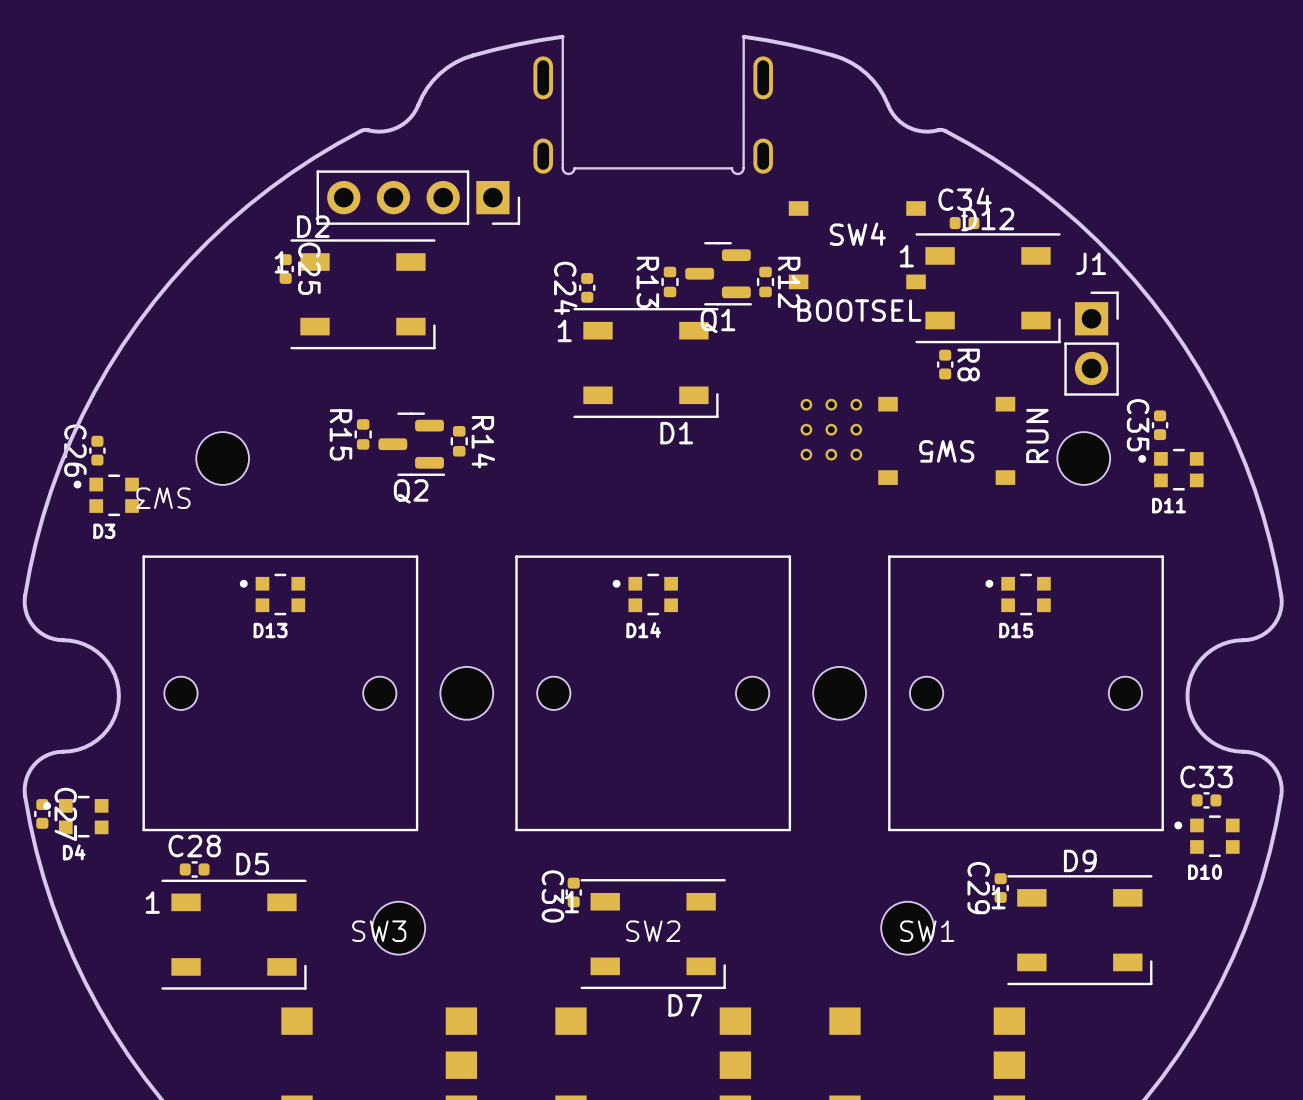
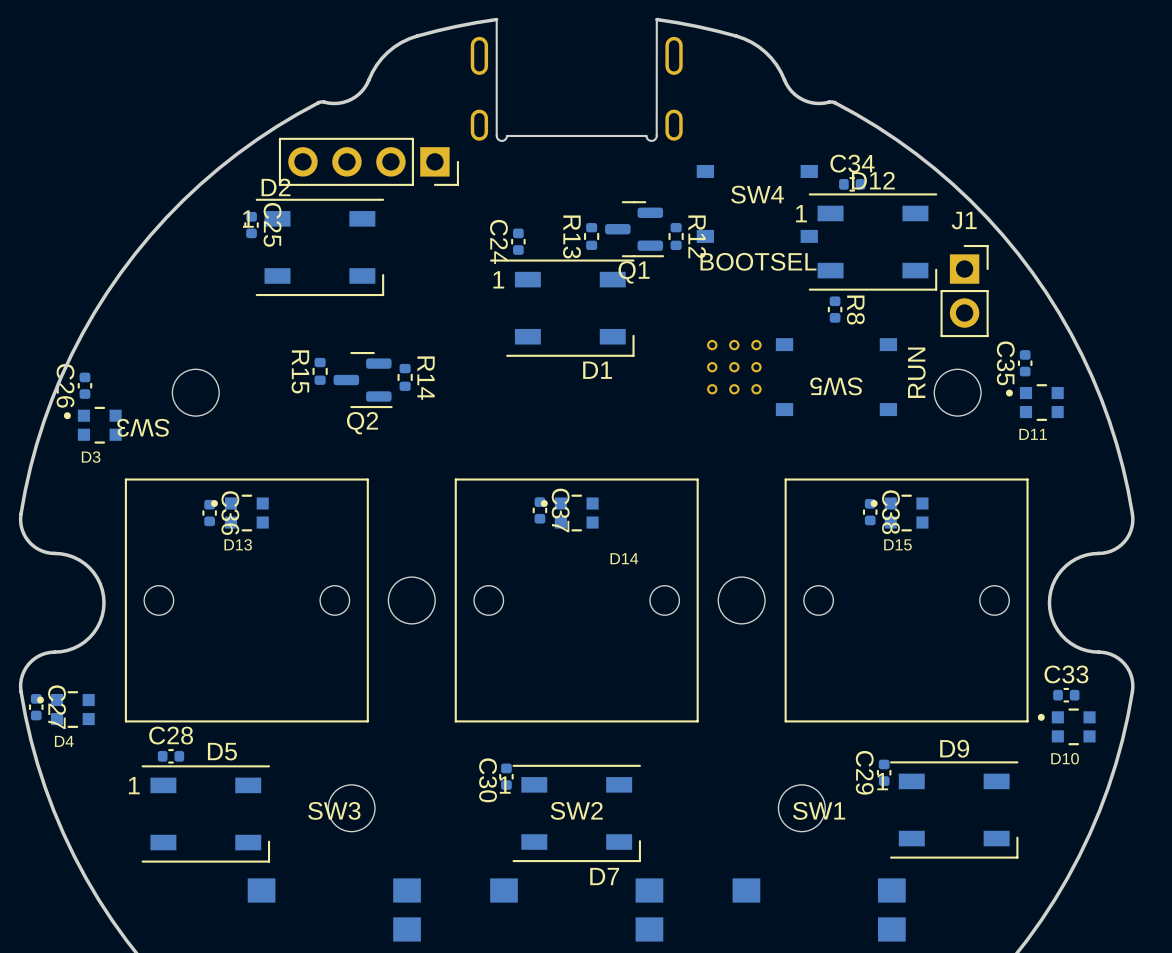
C37: none -> (539, 510)
C38: none -> (870, 512)
C36: none -> (209, 513)
D14 name position: D14 (643, 630) -> D14 (624, 558)

